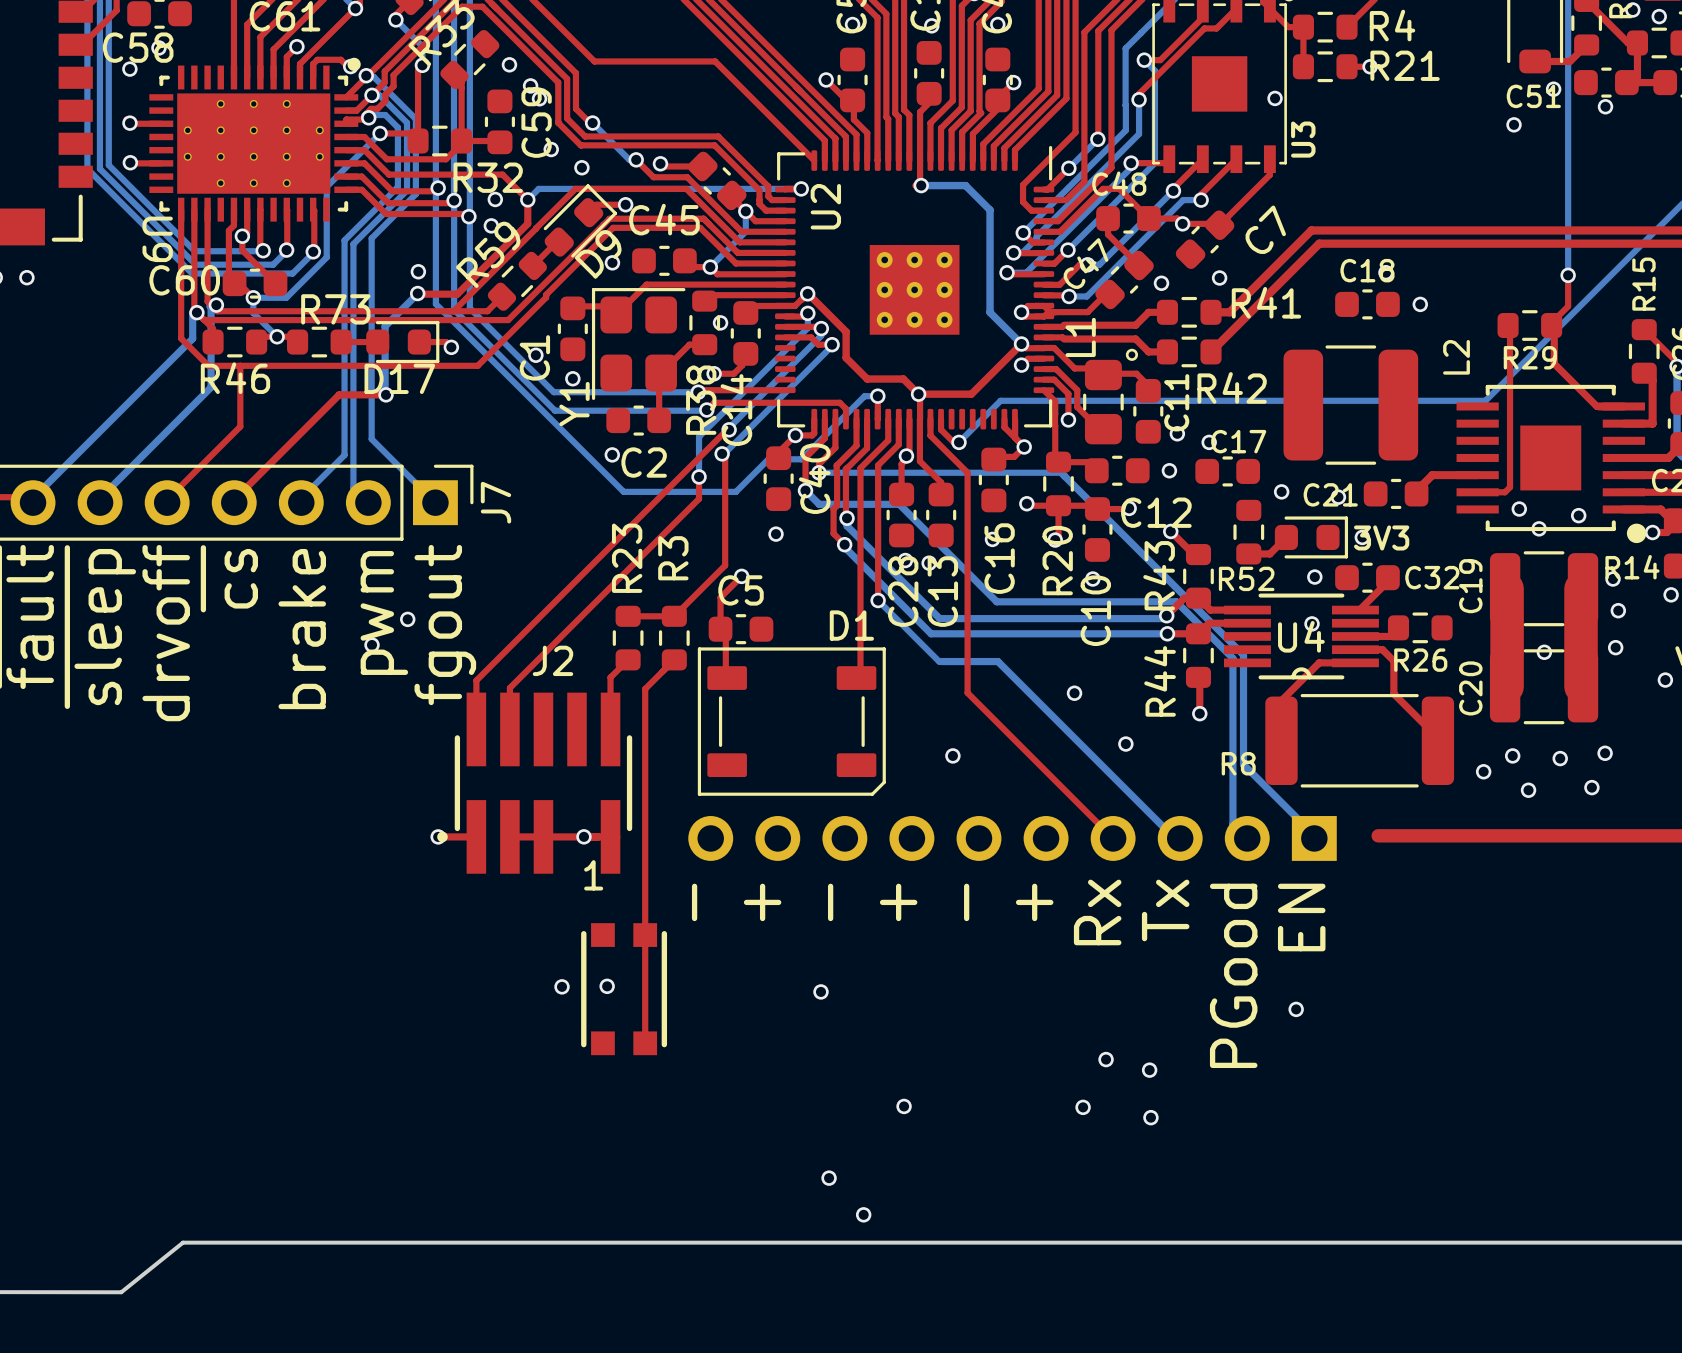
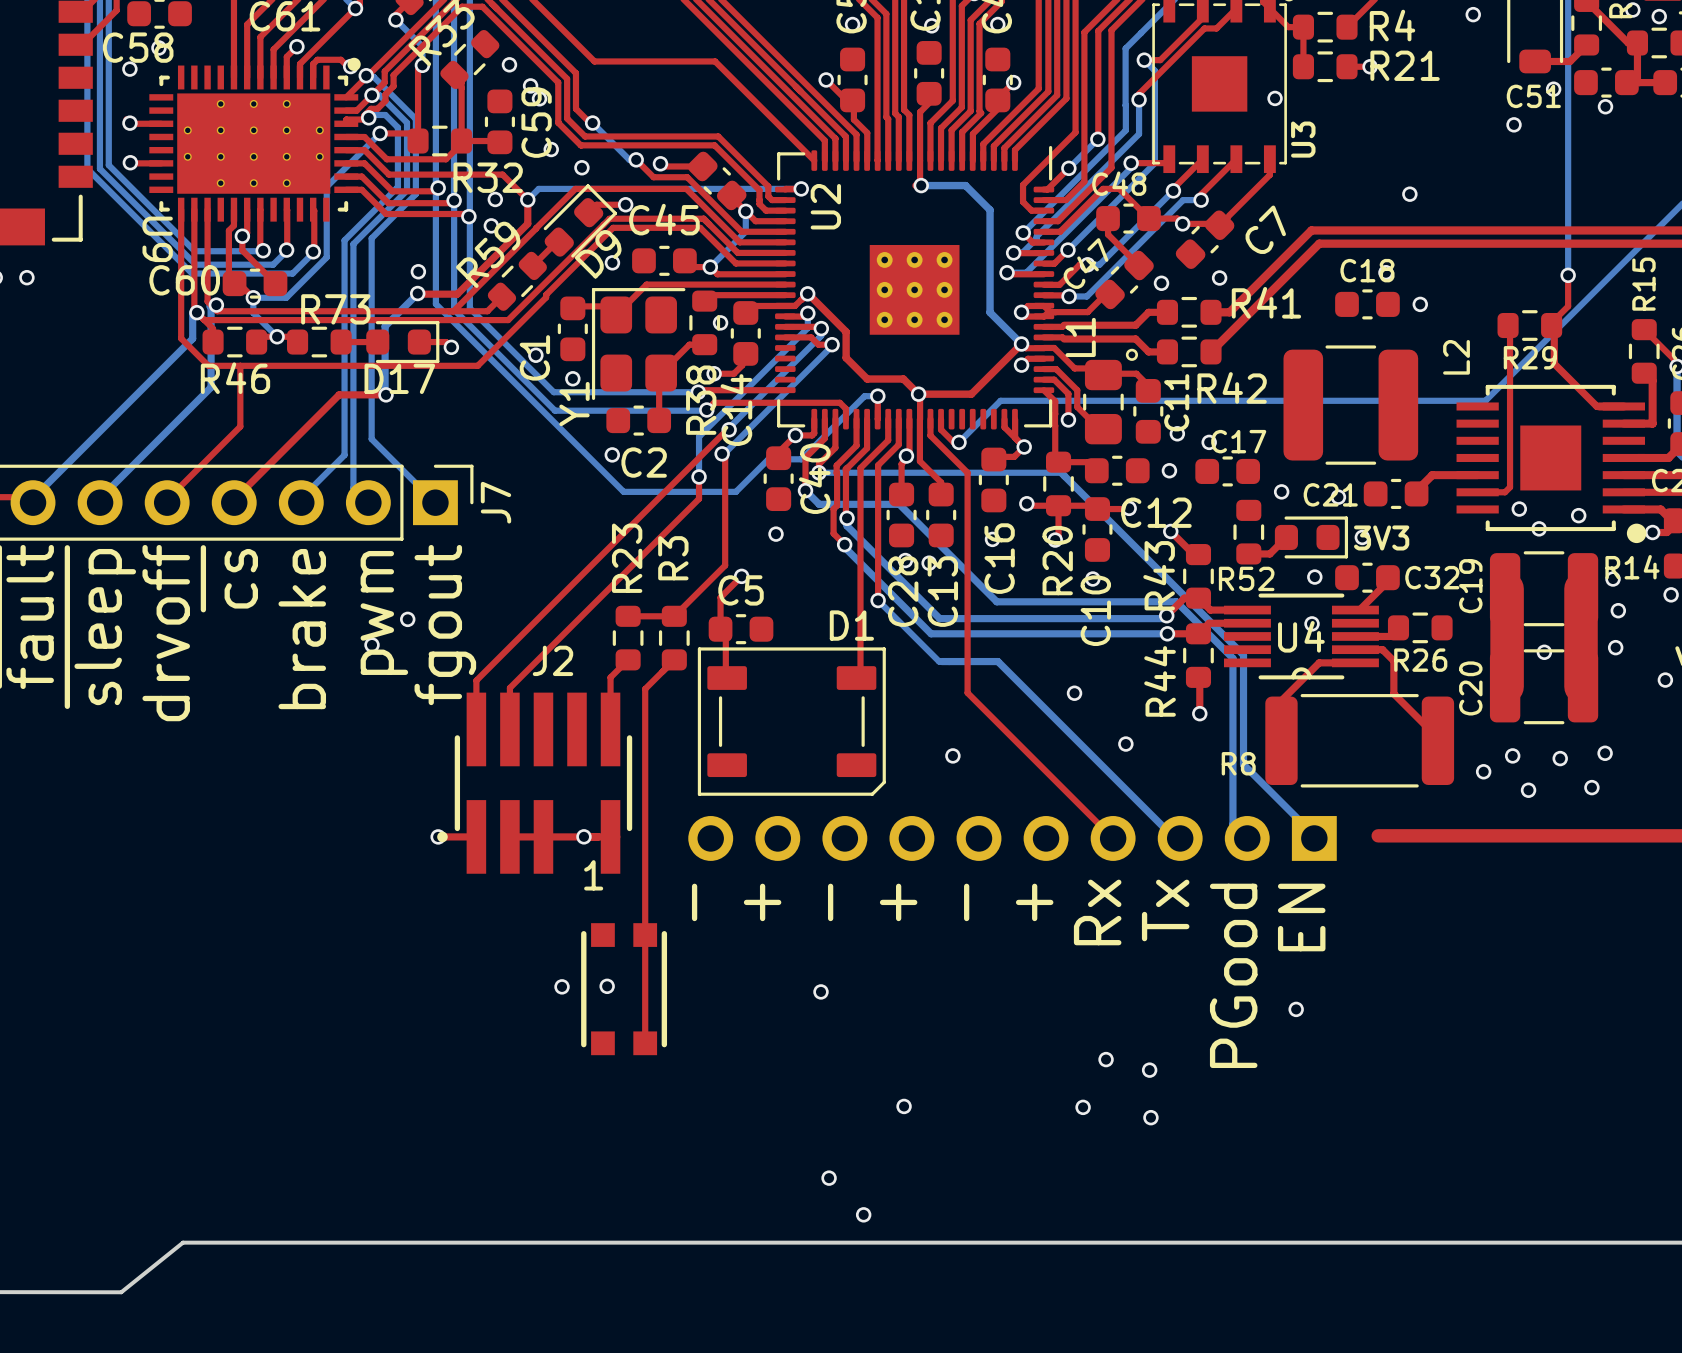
via: none -> (1473, 14)
via: none -> (1409, 194)

